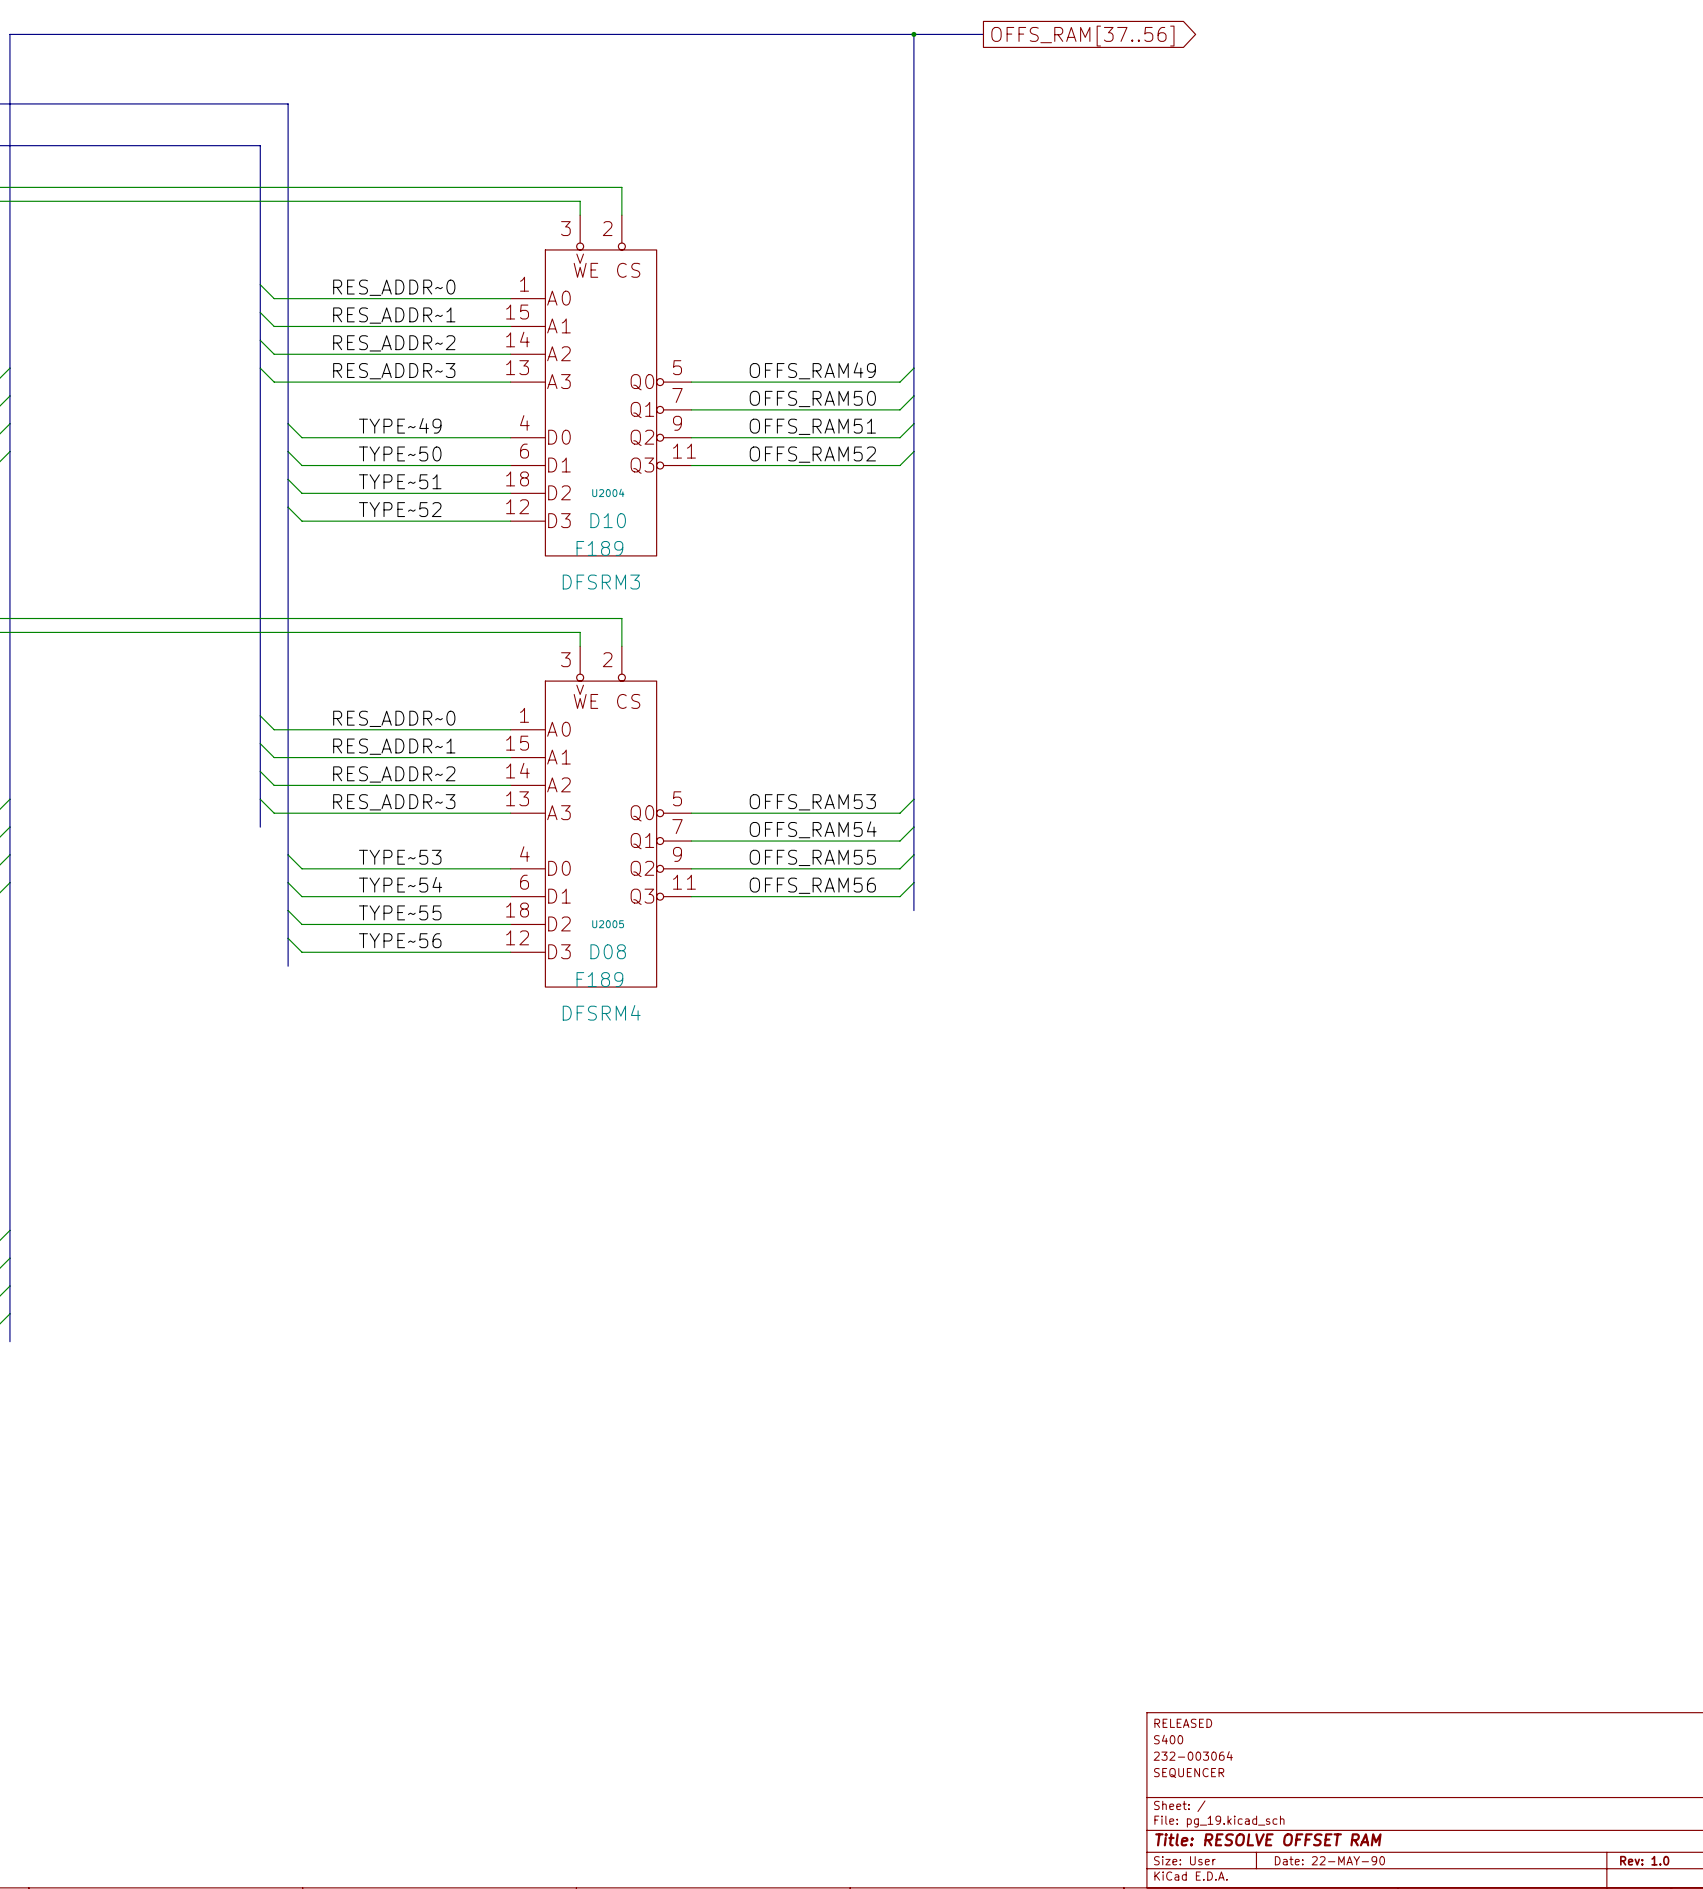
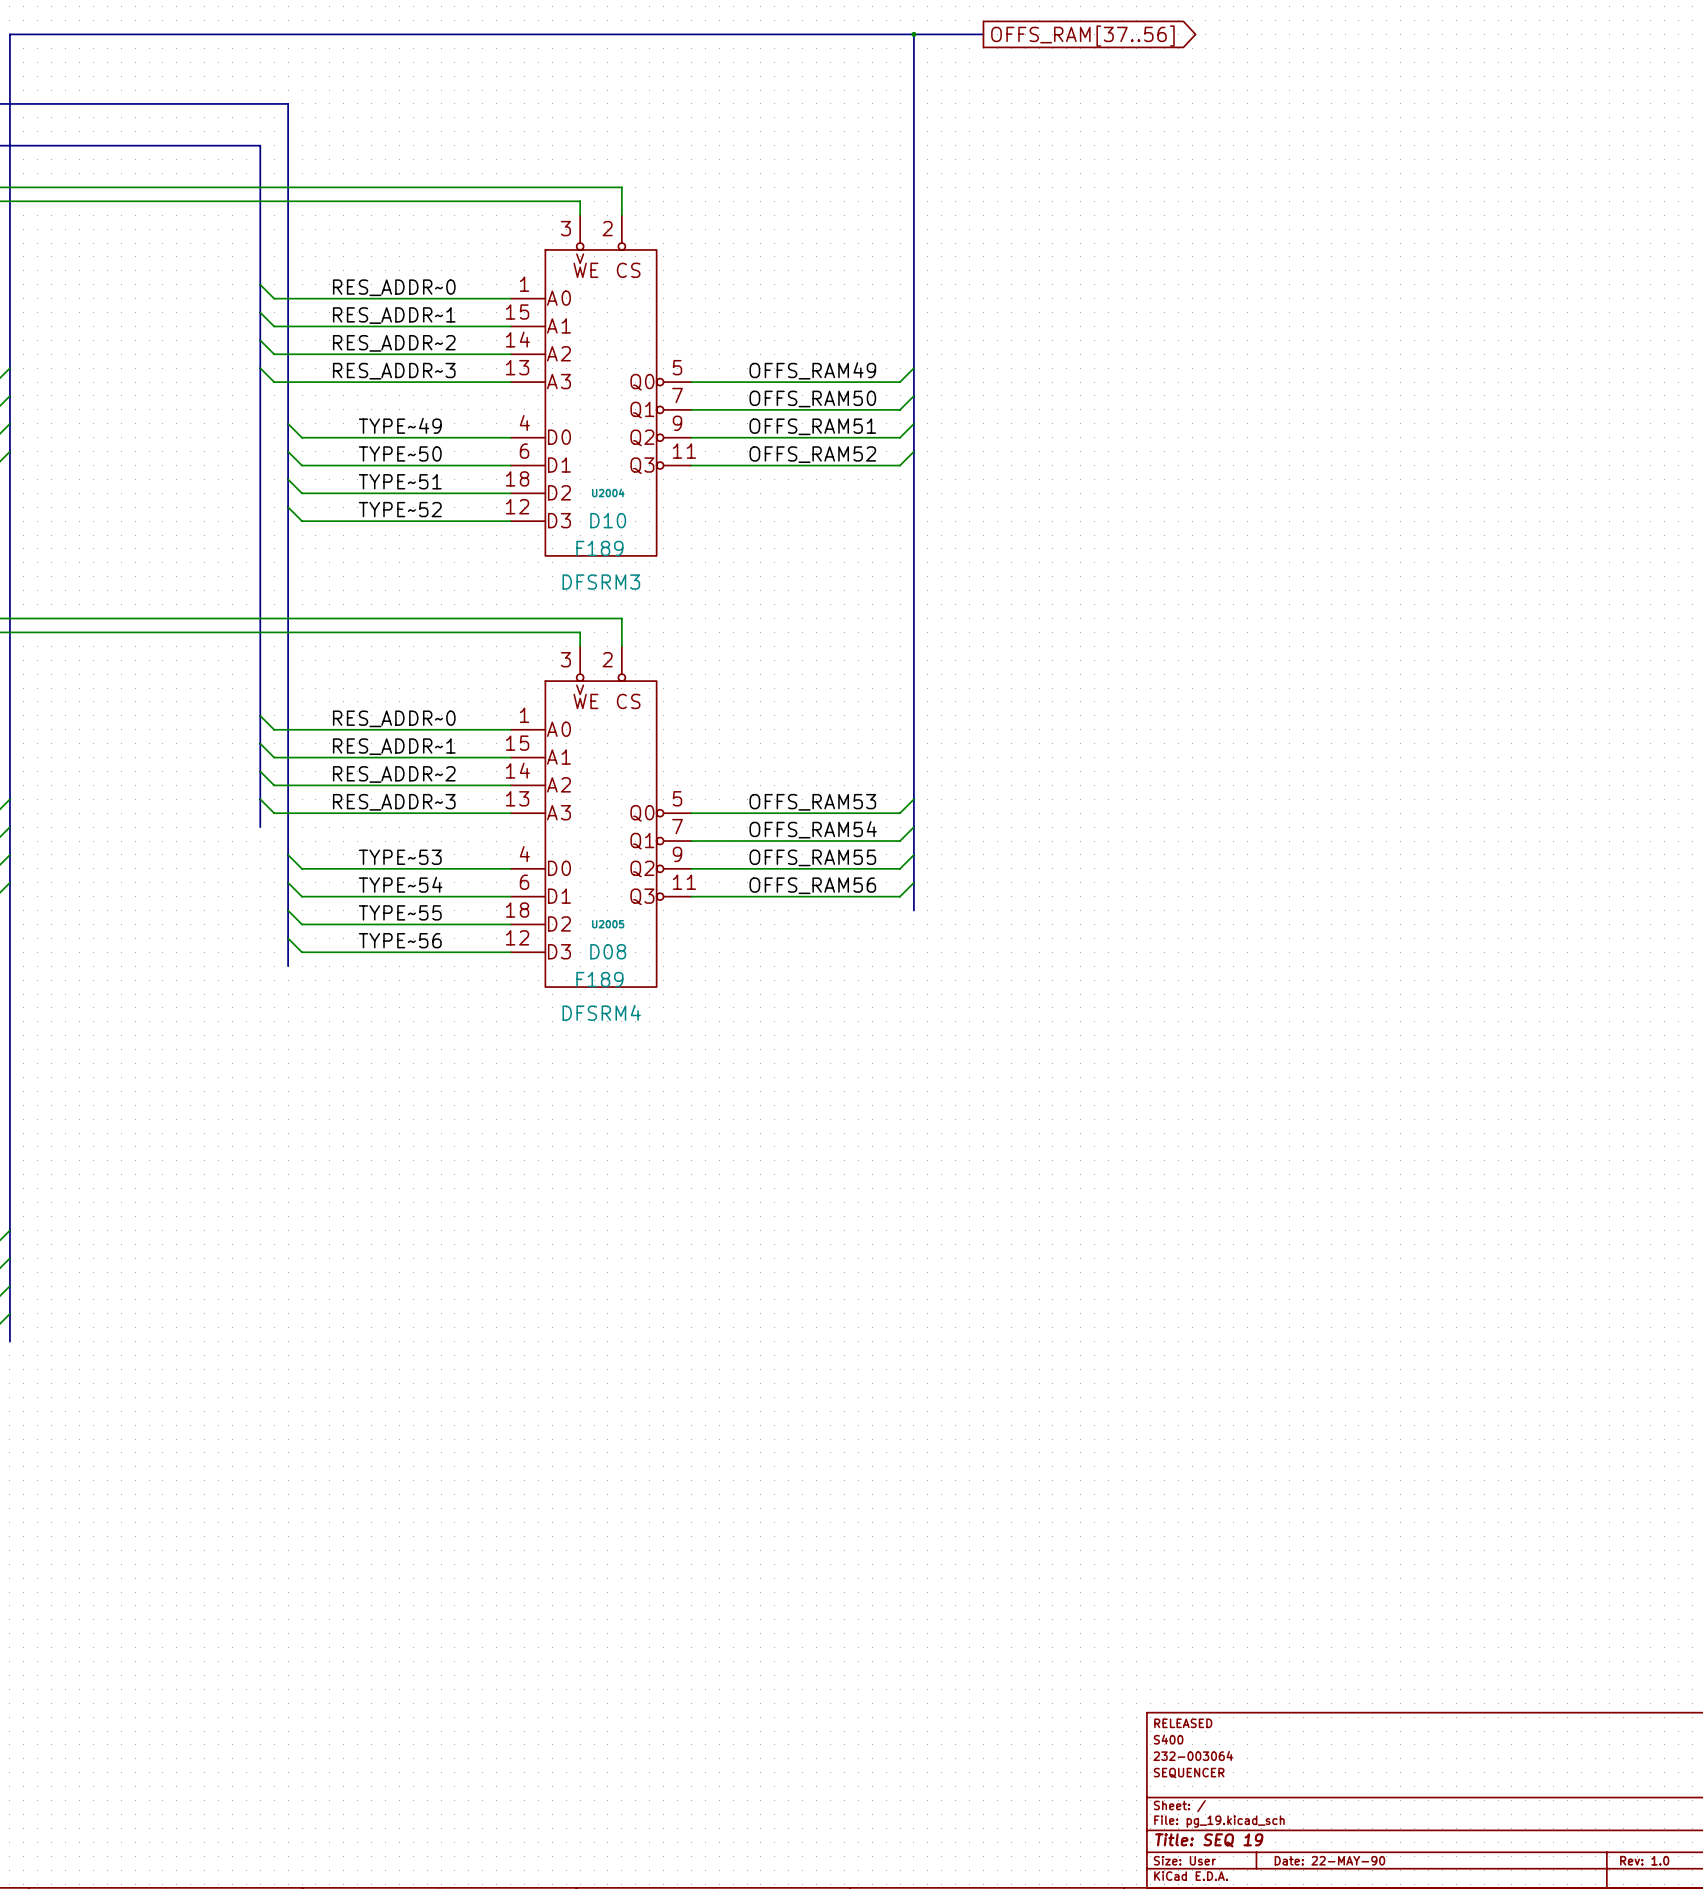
title block: Title: RESOLVE OFFSET RAM (1268, 1839) -> Title: SEQ 19 (1209, 1840)

